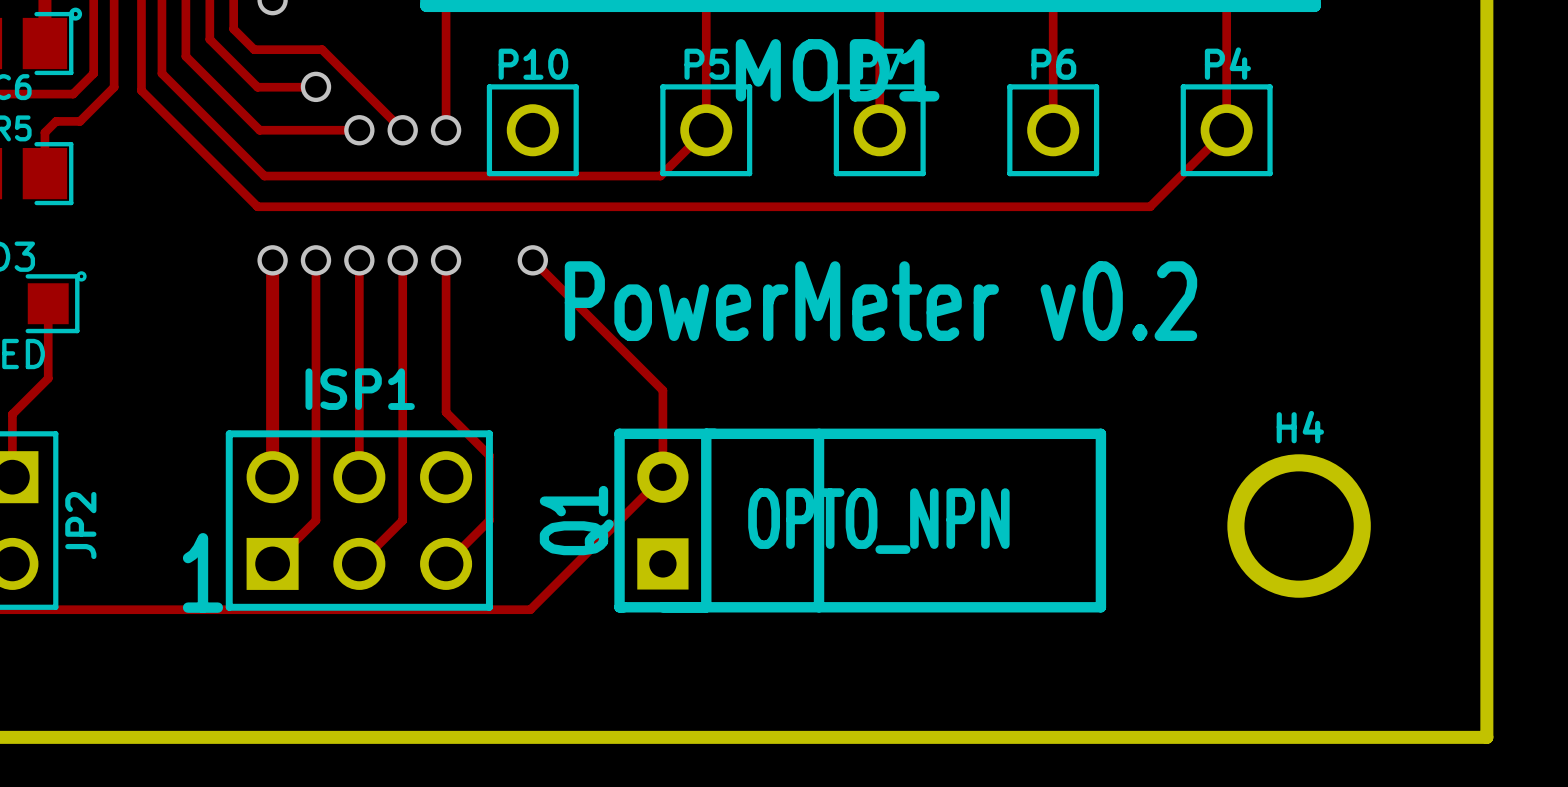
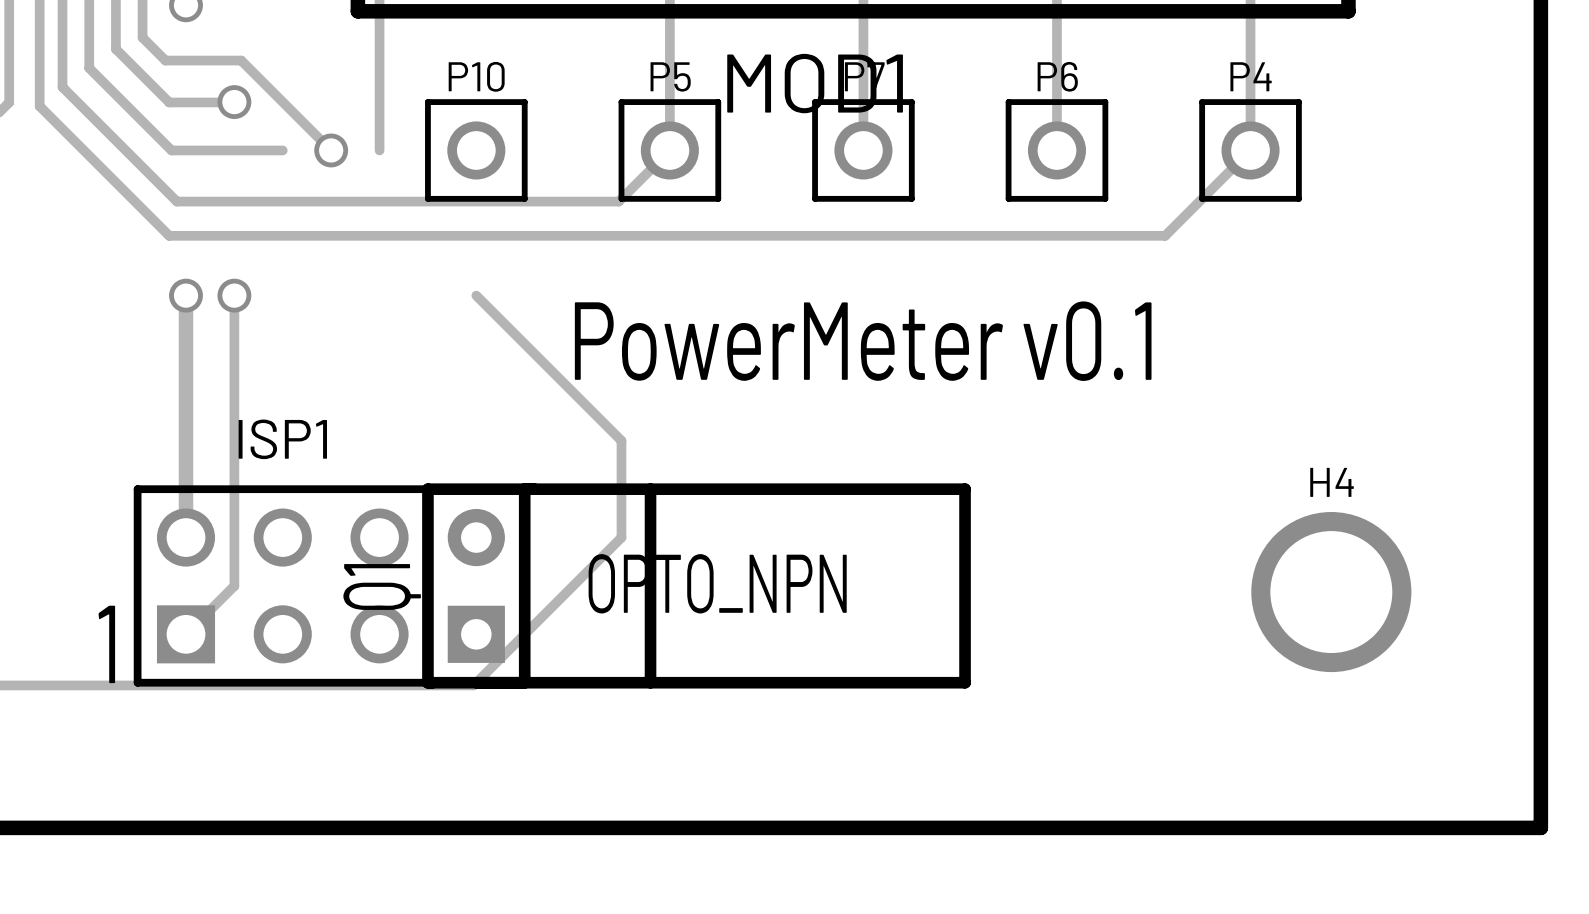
via: (359, 130) -> none
via: (446, 130) -> none
track: (359, 260) (359, 477) -> none
via: (359, 260) -> none
track: (402, 260) (402, 520) (359, 563) -> none
via: (402, 260) -> none
track: (446, 260) (446, 412) (489, 455) (489, 520) (446, 563) -> none
via: (446, 260) -> none
via: (532, 260) -> none
text: PowerMeter v0.2 (880, 301) -> PowerMeter v0.1 (863, 341)
Q1 position: (860, 520) -> (696, 585)

